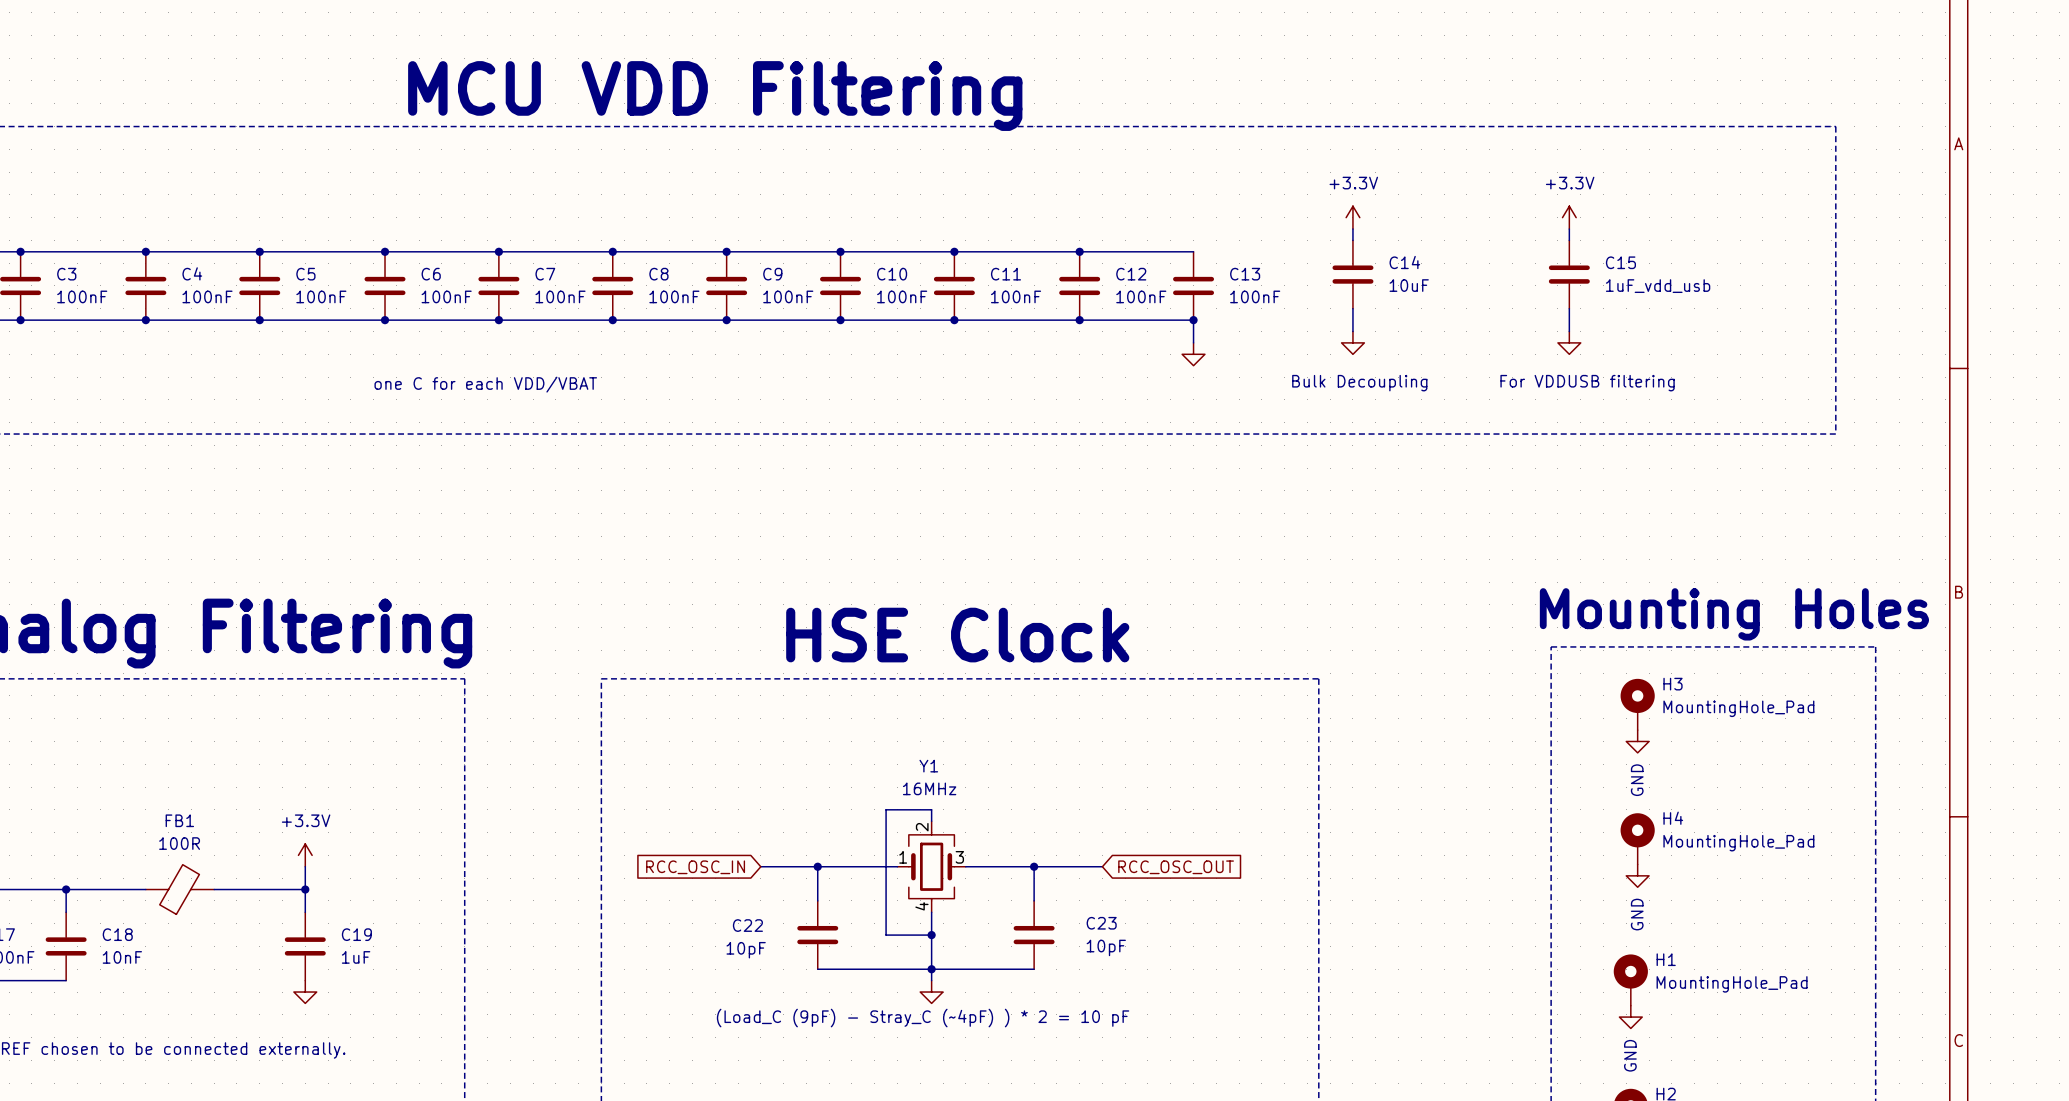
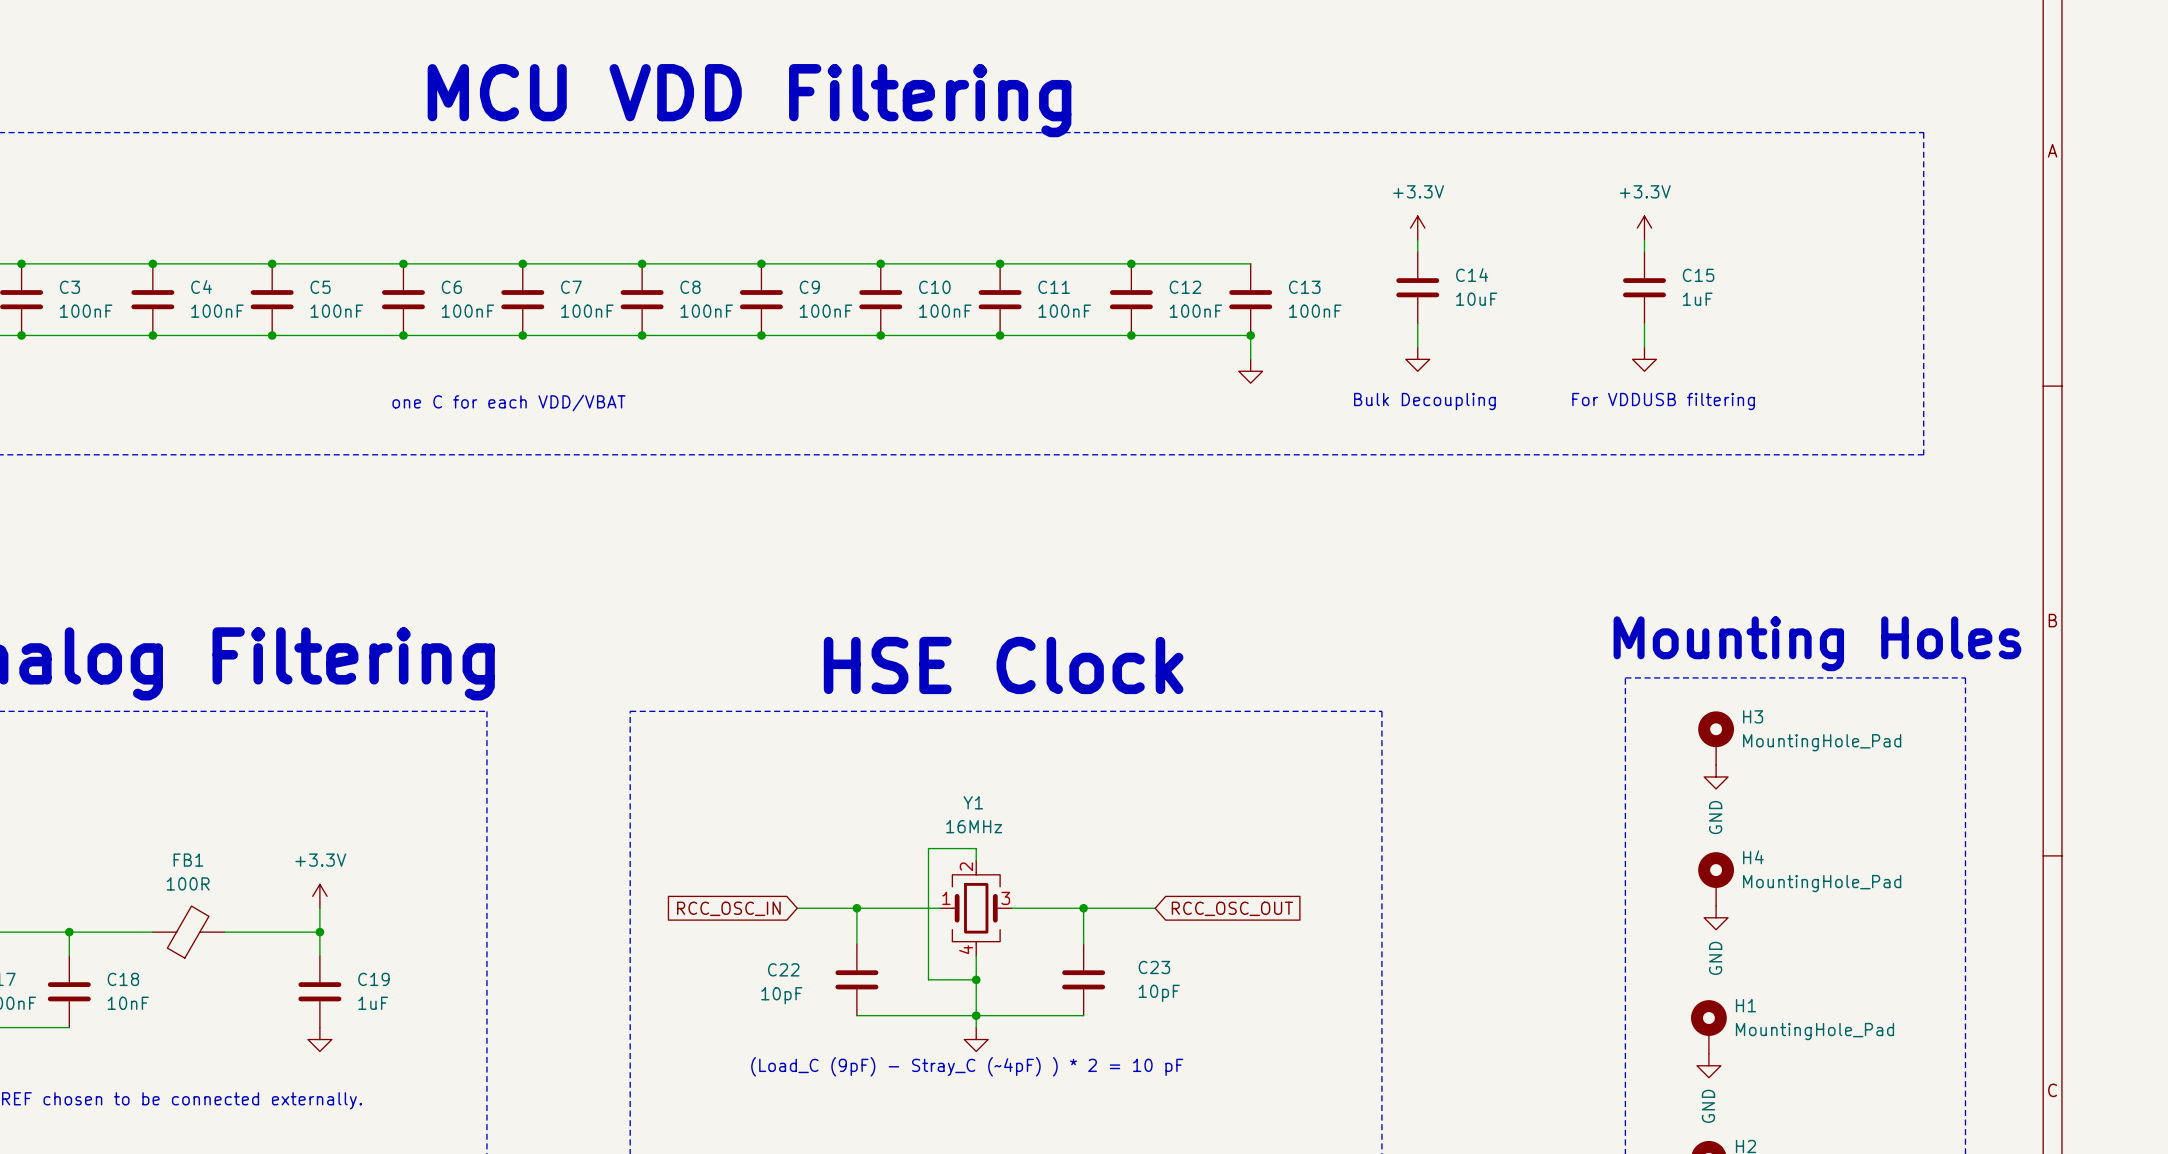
C15 value: 1uF_vdd_usb (1658, 286) -> 1uF (1697, 299)

